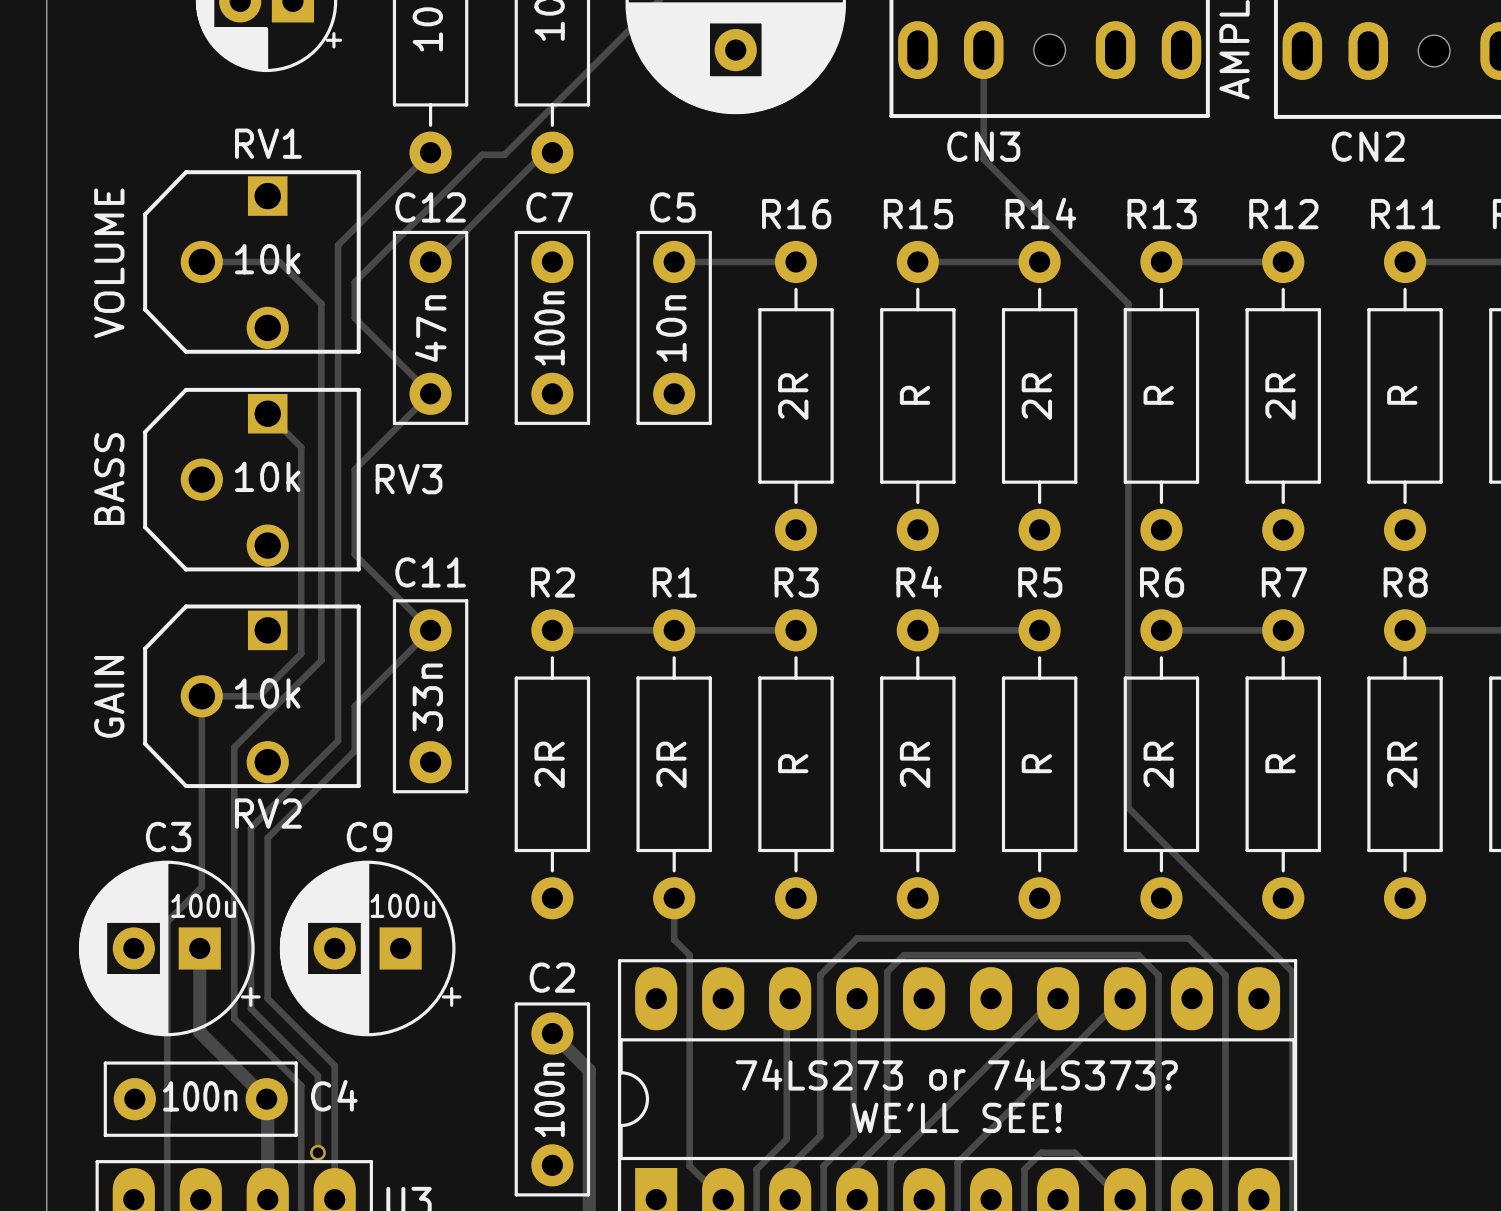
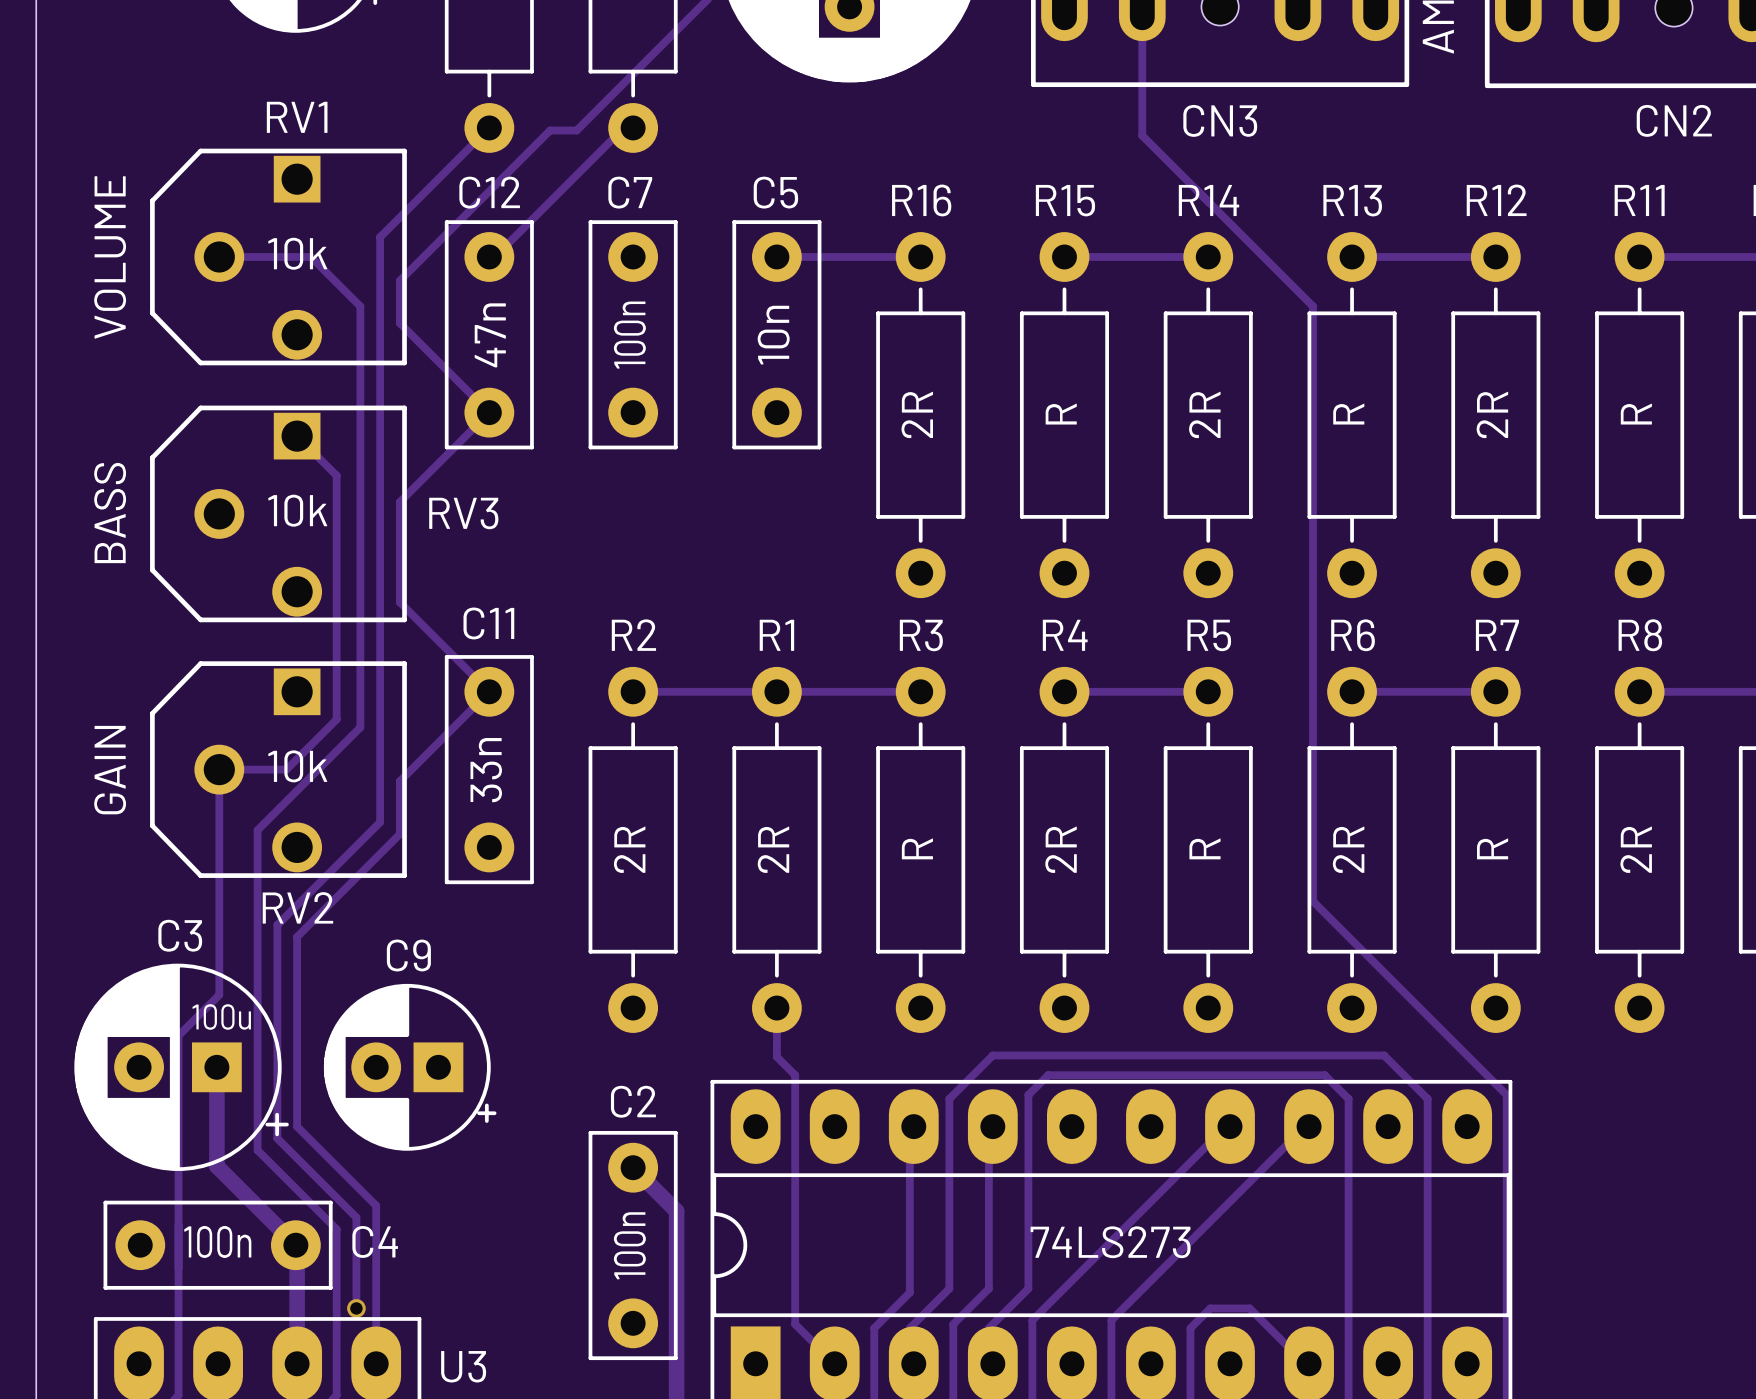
CN3 name position: CN3 (983, 146) -> CN3 (1220, 120)
CN2 name position: CN2 (1368, 146) -> CN2 (1674, 120)
C9 footprint: [279, 860, 462, 1037] -> [323, 983, 497, 1151]
C9 value: 100u (402, 905) -> none
text: 74LS273 or 74LS373? (956, 1074) -> none
part value: none -> 74LS273 (1110, 1242)
text: WE'LL SEE! (956, 1117) -> none

